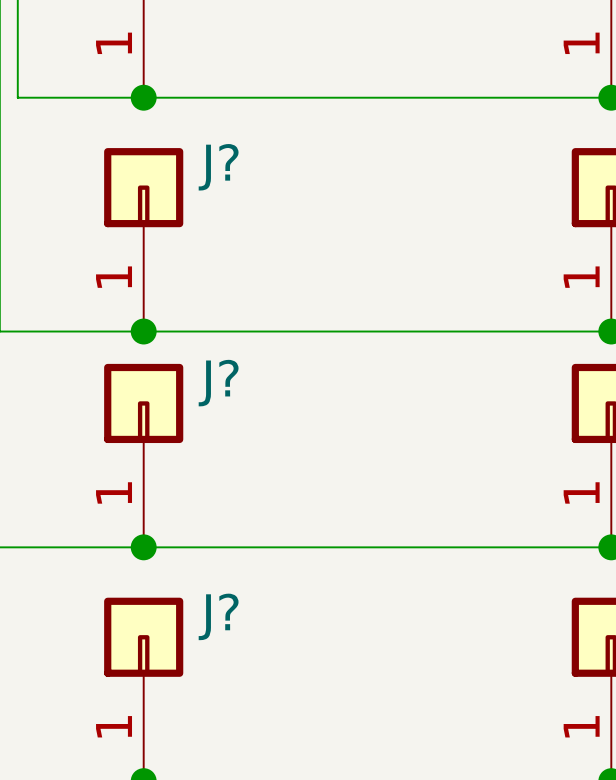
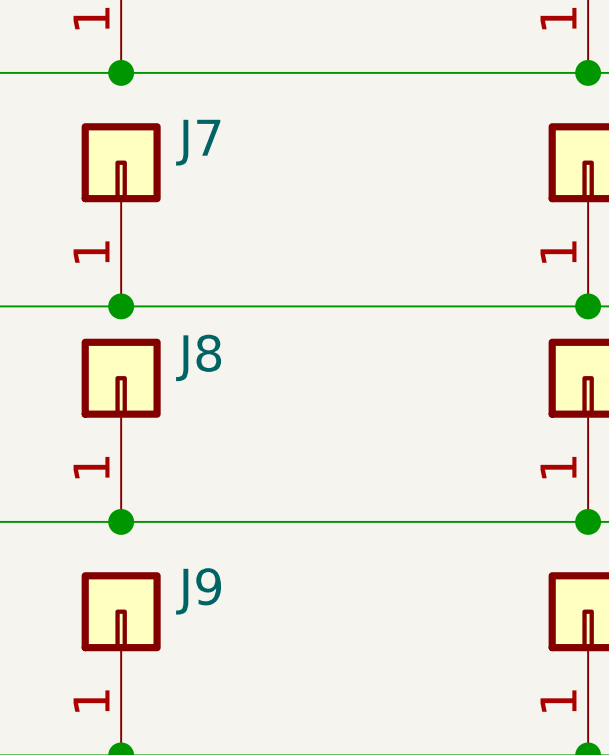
J? name: J? (218, 167) -> J7 (198, 142)
J? name: J? (218, 383) -> J8 (198, 357)
J? name: J? (218, 616) -> J9 (198, 591)

